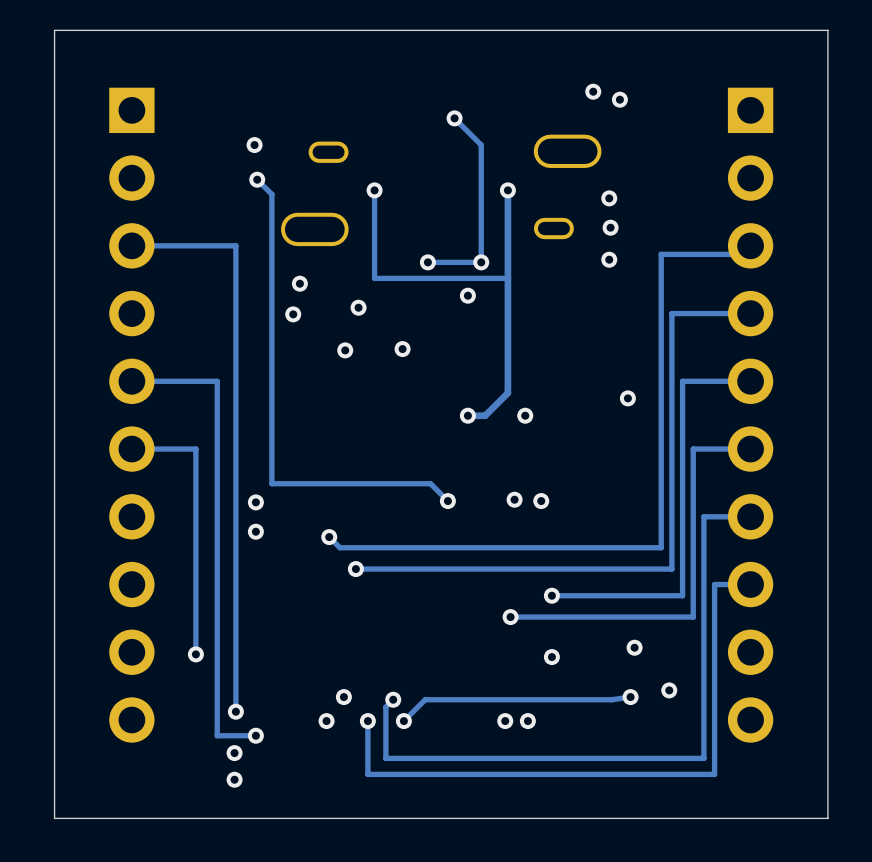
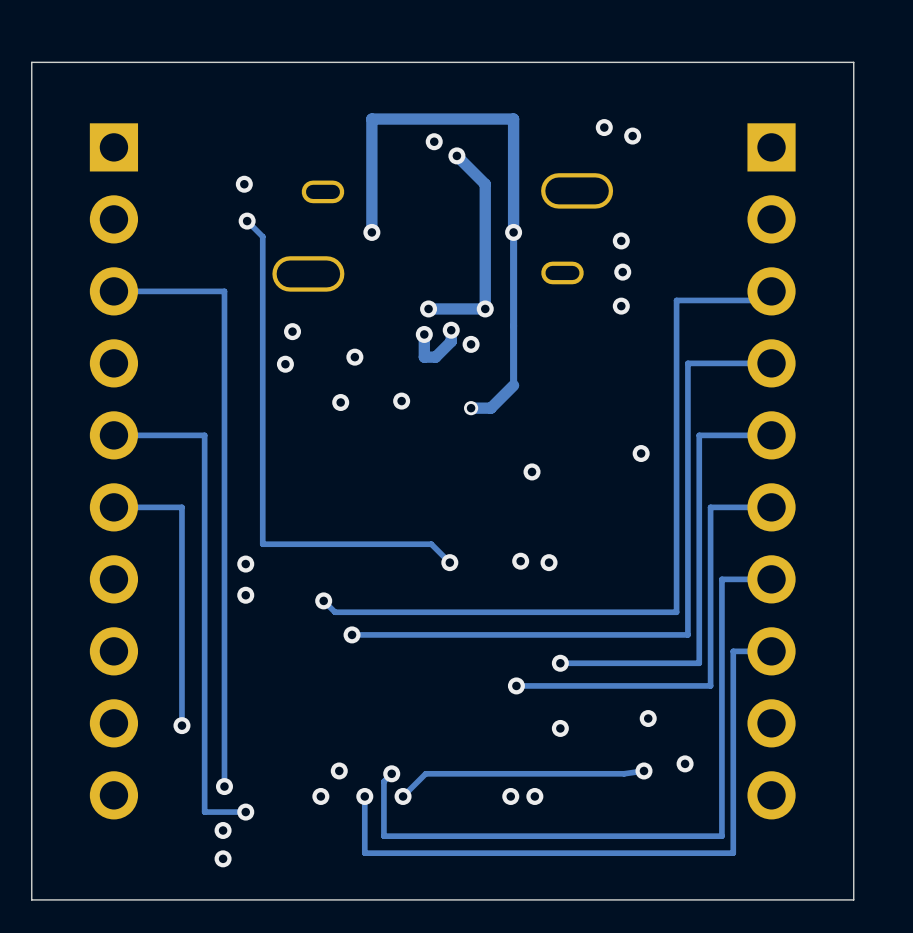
via: none -> (434, 141)
track width: thin (454, 118) (481, 145) (481, 262) (427, 262) -> thick (456, 155) (485, 184) (485, 308) (428, 308)
track: (374, 190) (374, 278) (507, 278) -> (371, 232) (371, 119) (513, 119) (513, 232)
track: none -> (451, 330) (451, 341) (435, 357) (424, 357) (424, 334)
via: none -> (451, 330)
via: none -> (424, 334)
track: (507, 334) (507, 393) (485, 415) (467, 415) -> (513, 385) (490, 408) (471, 408)
via: none -> (471, 408)
via: (467, 415) -> none

